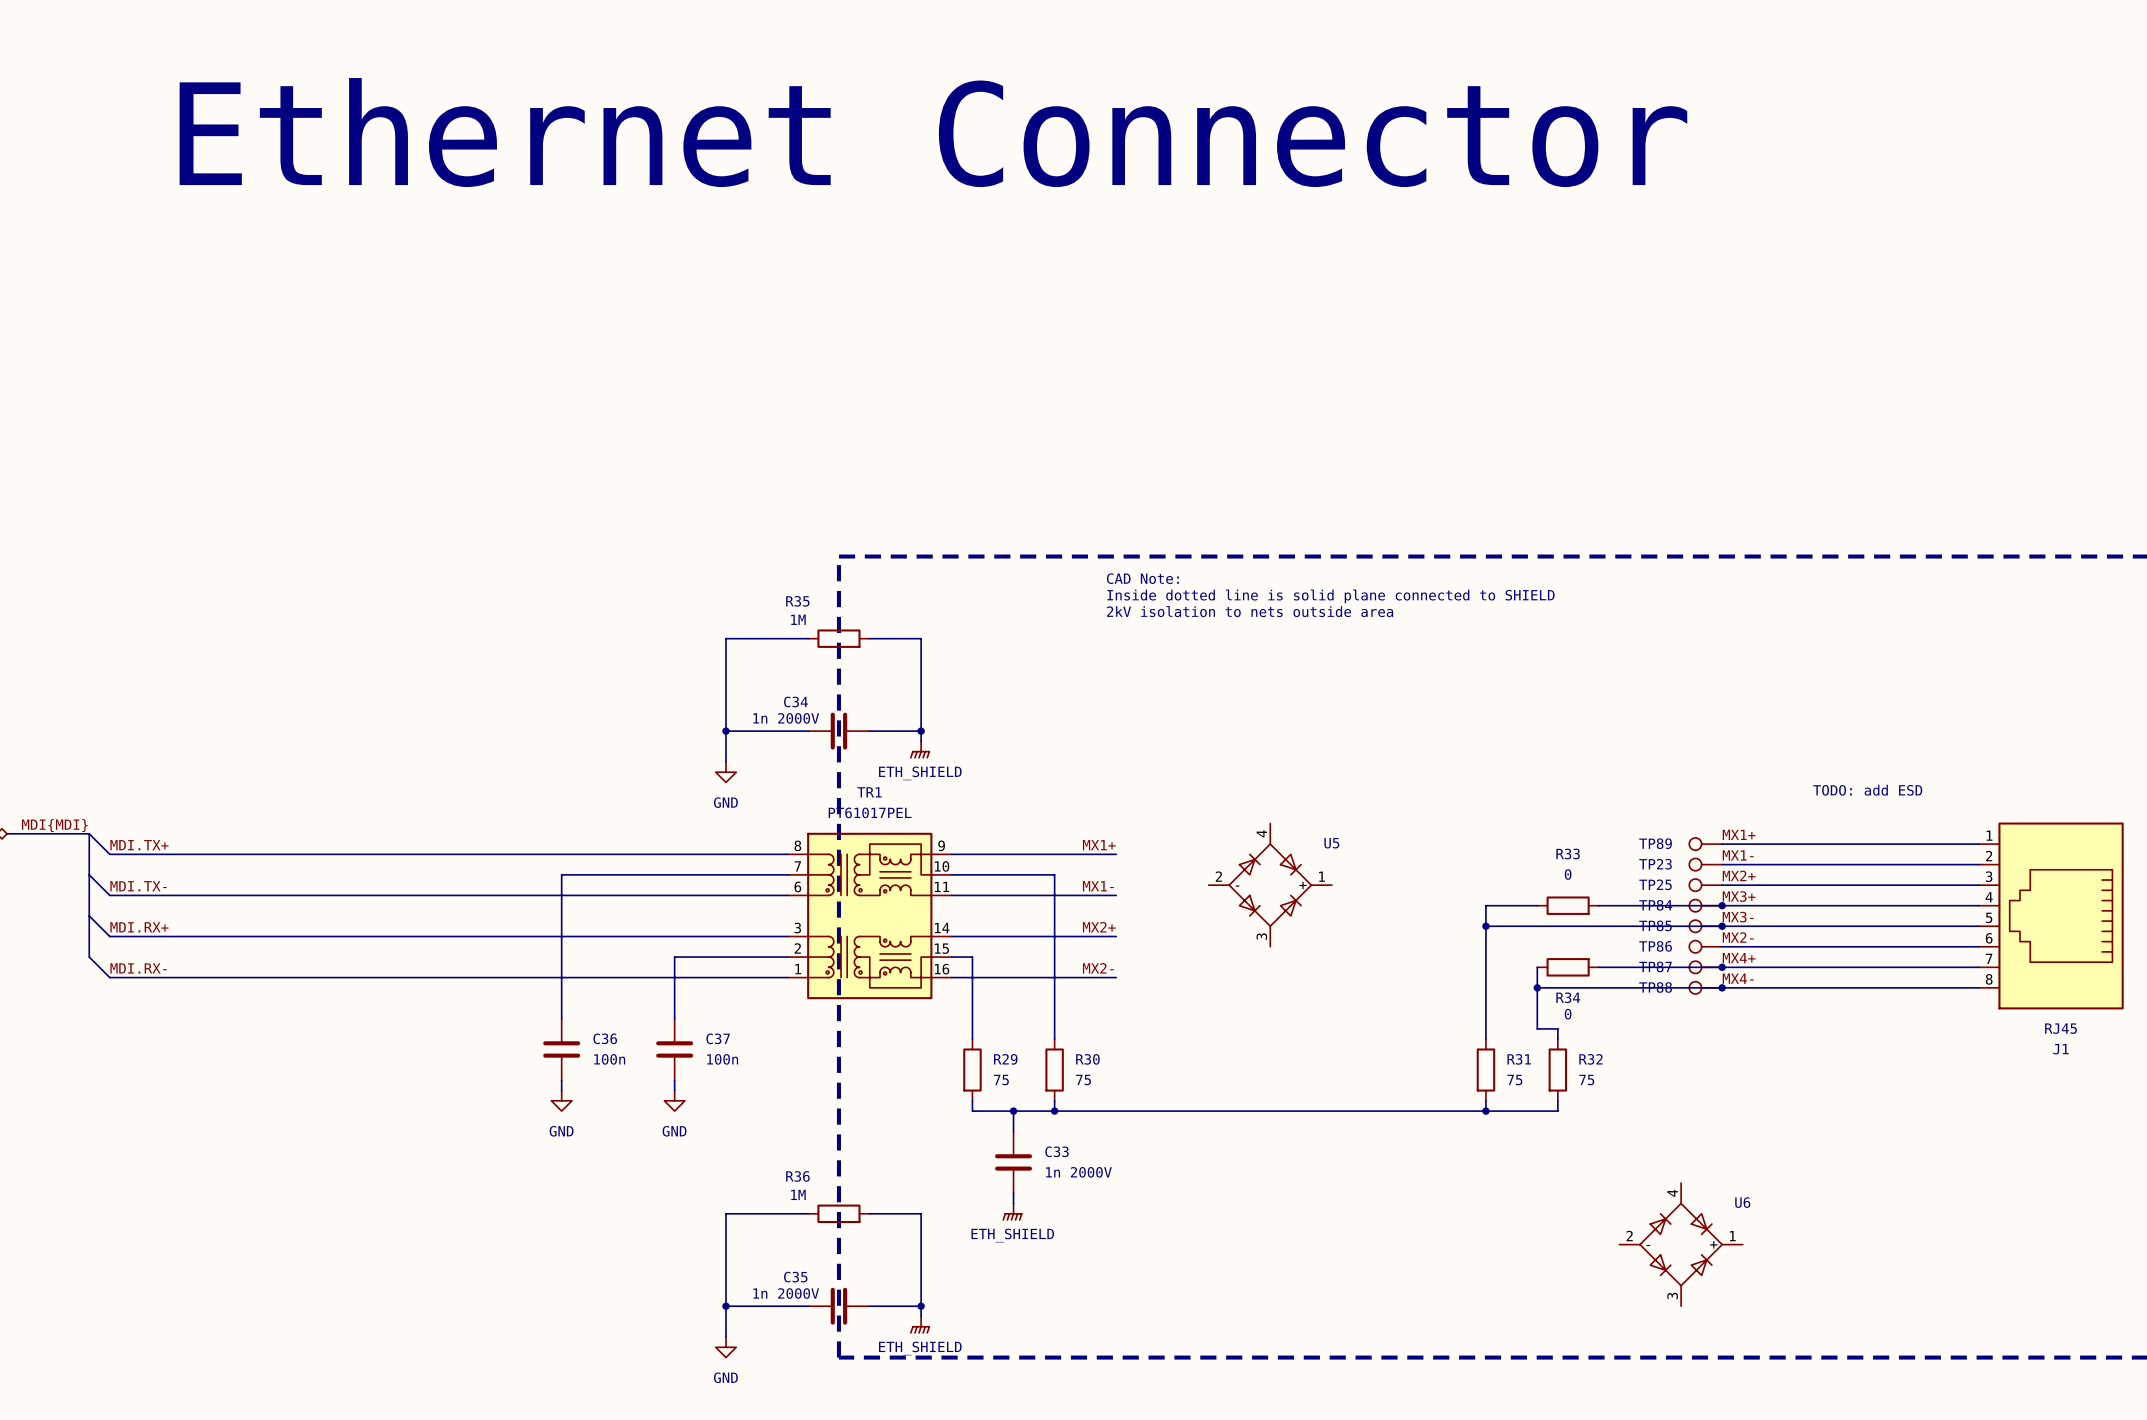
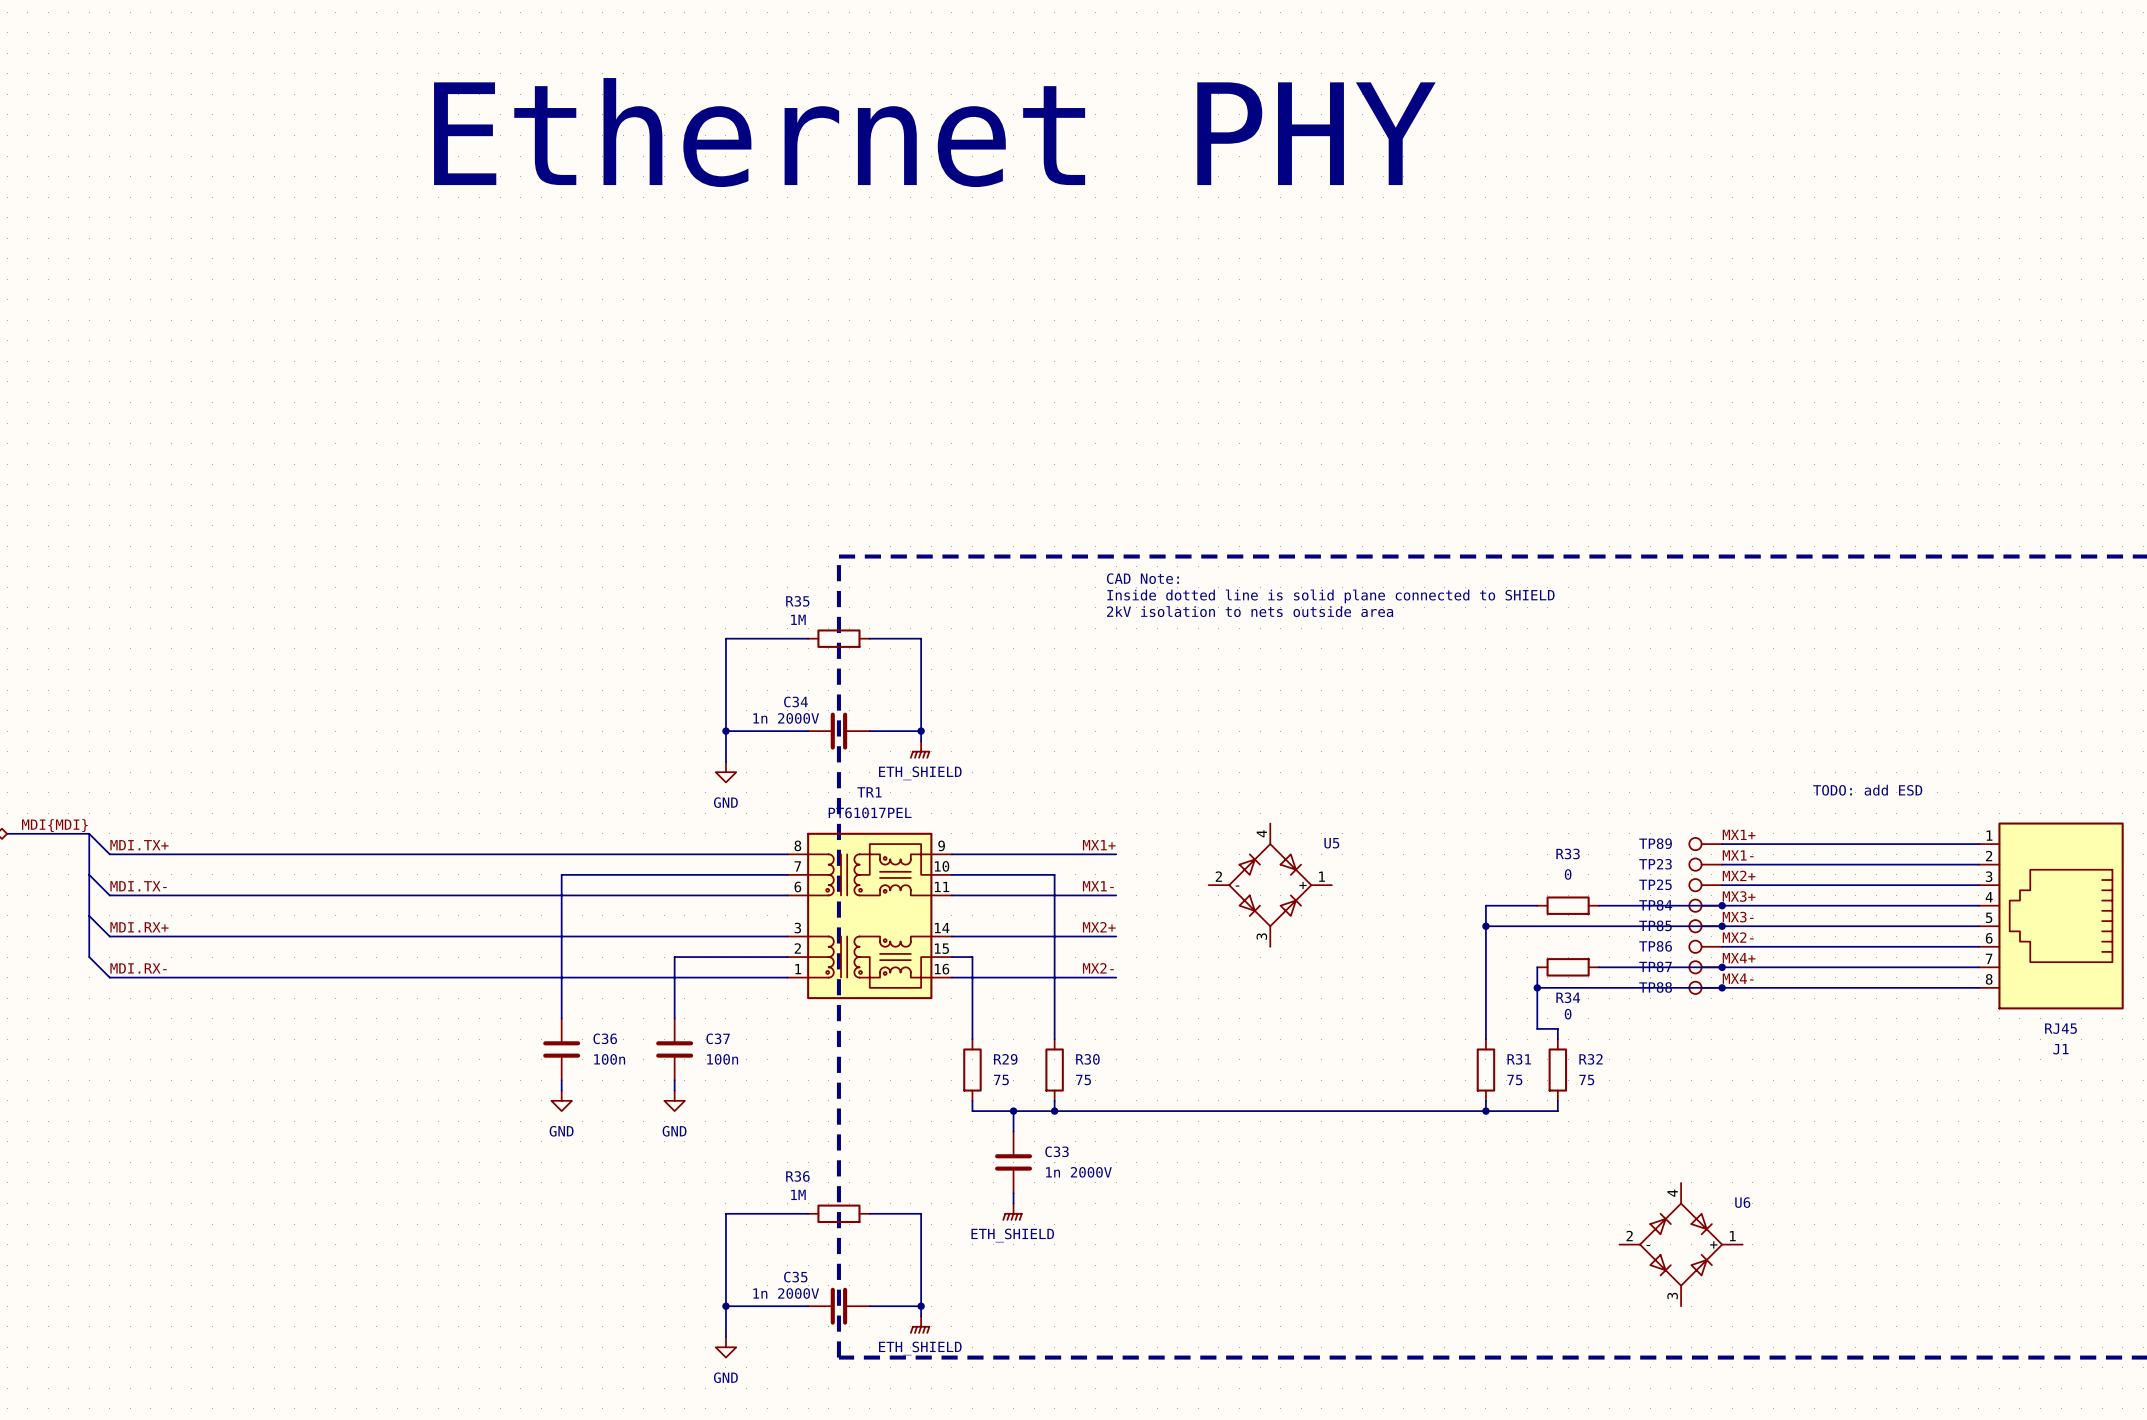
text: Ethernet Connector (933, 132) -> Ethernet PHY (934, 132)

